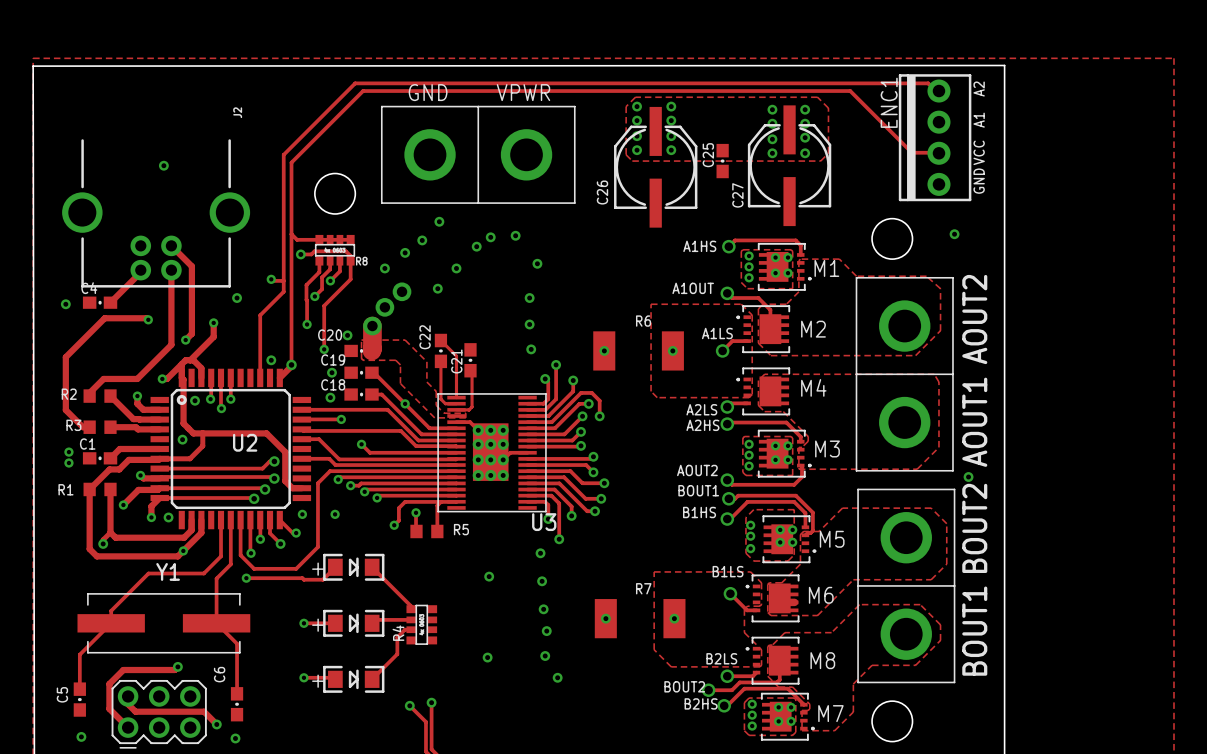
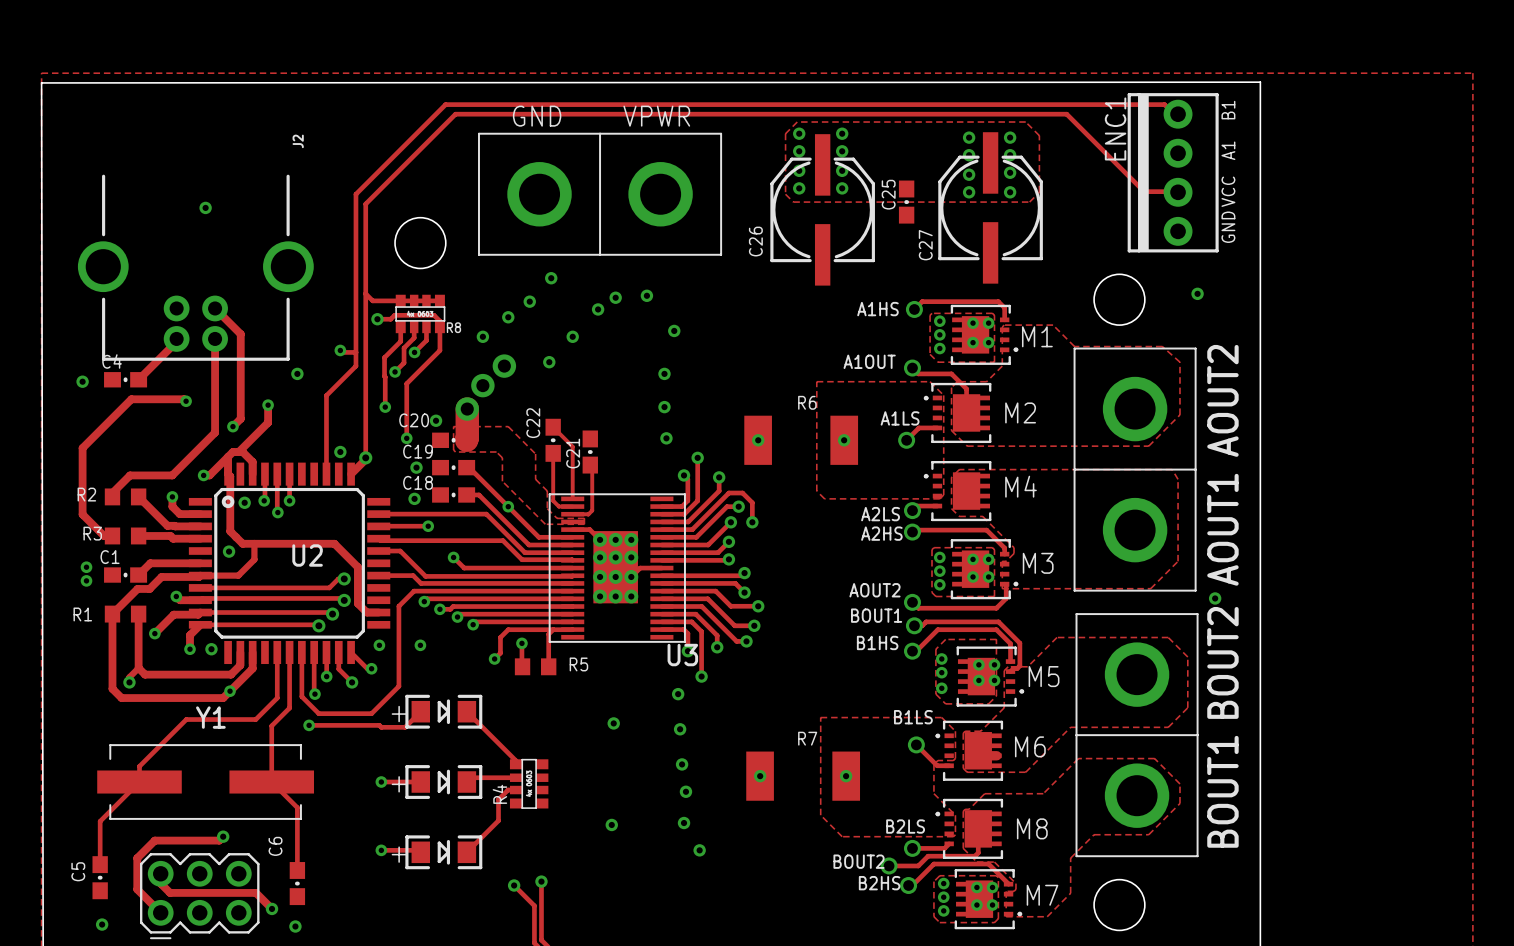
text: A2 (979, 89) -> B1 (1228, 110)

